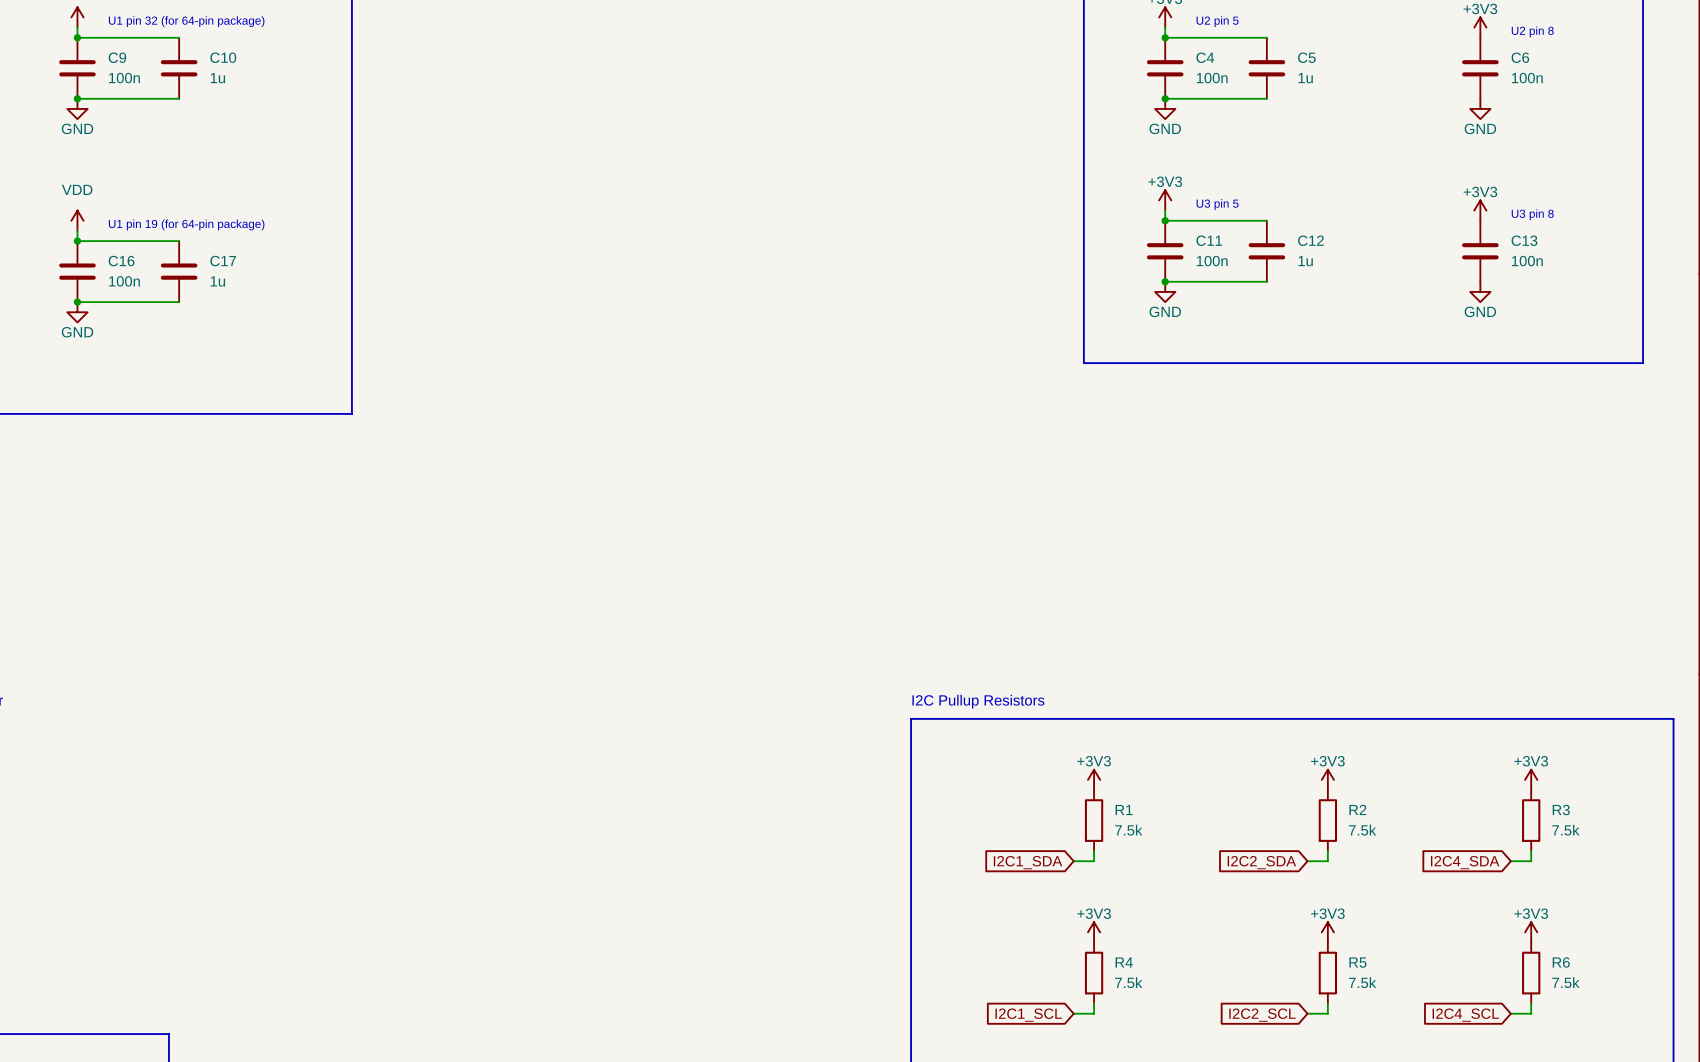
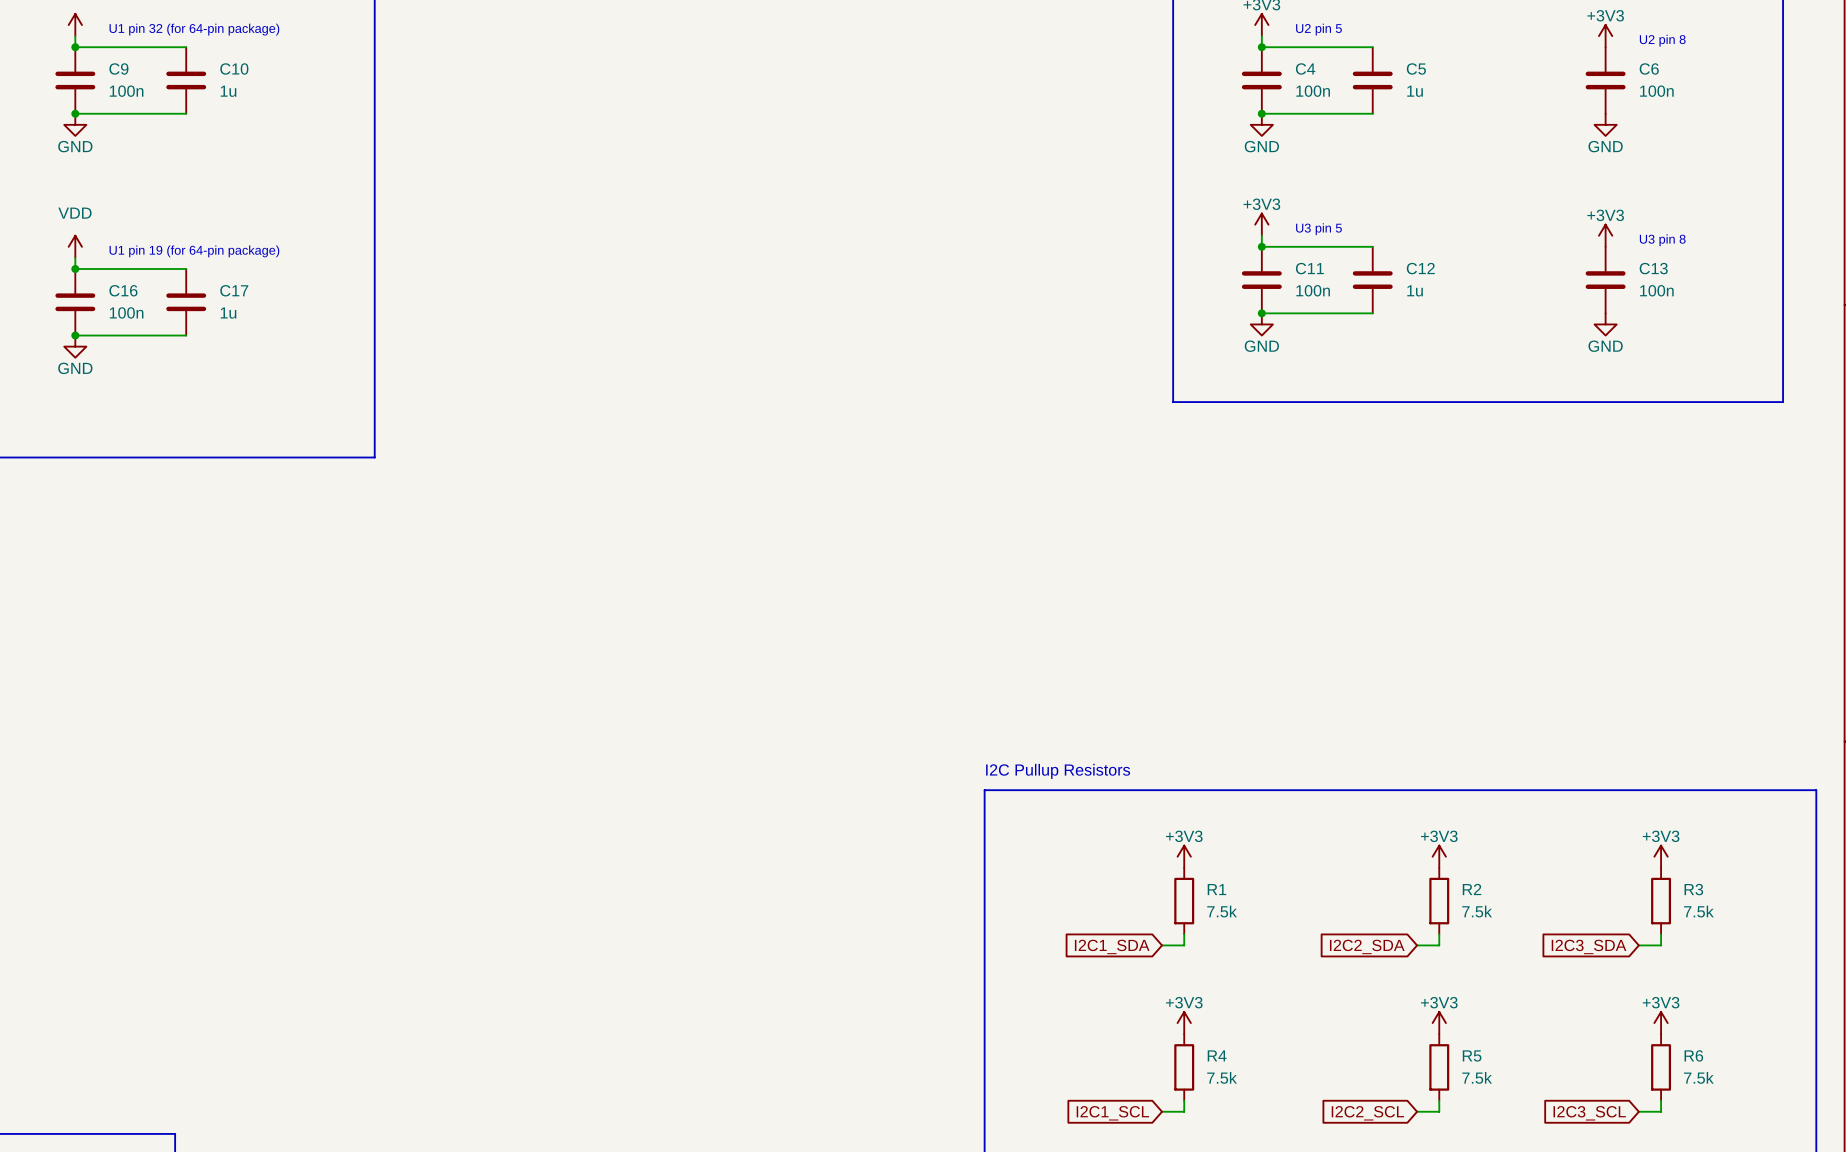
global label: I2C4_SDA (1465, 862) -> I2C3_SDA (1589, 946)
global label: I2C4_SCL (1465, 1015) -> I2C3_SCL (1589, 1113)

